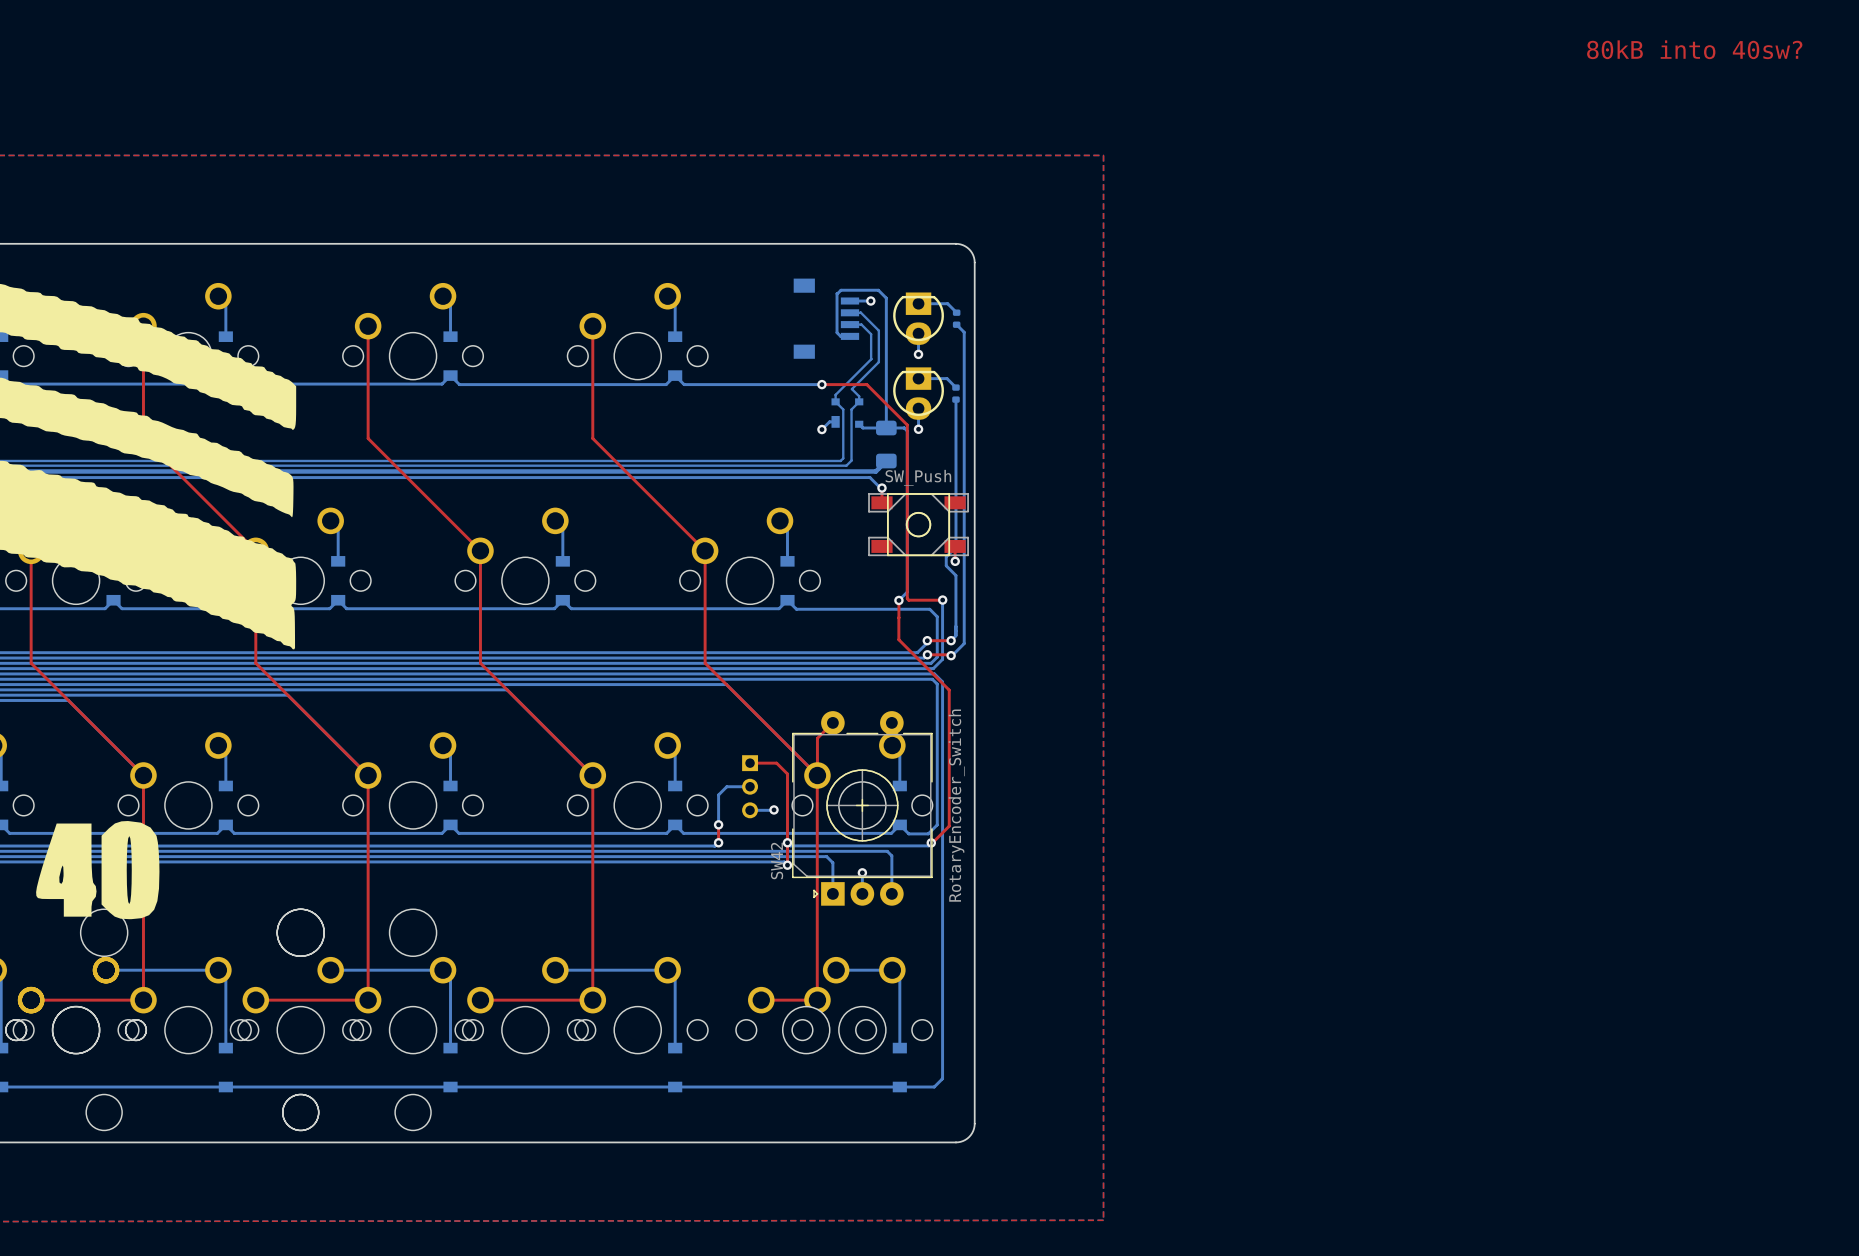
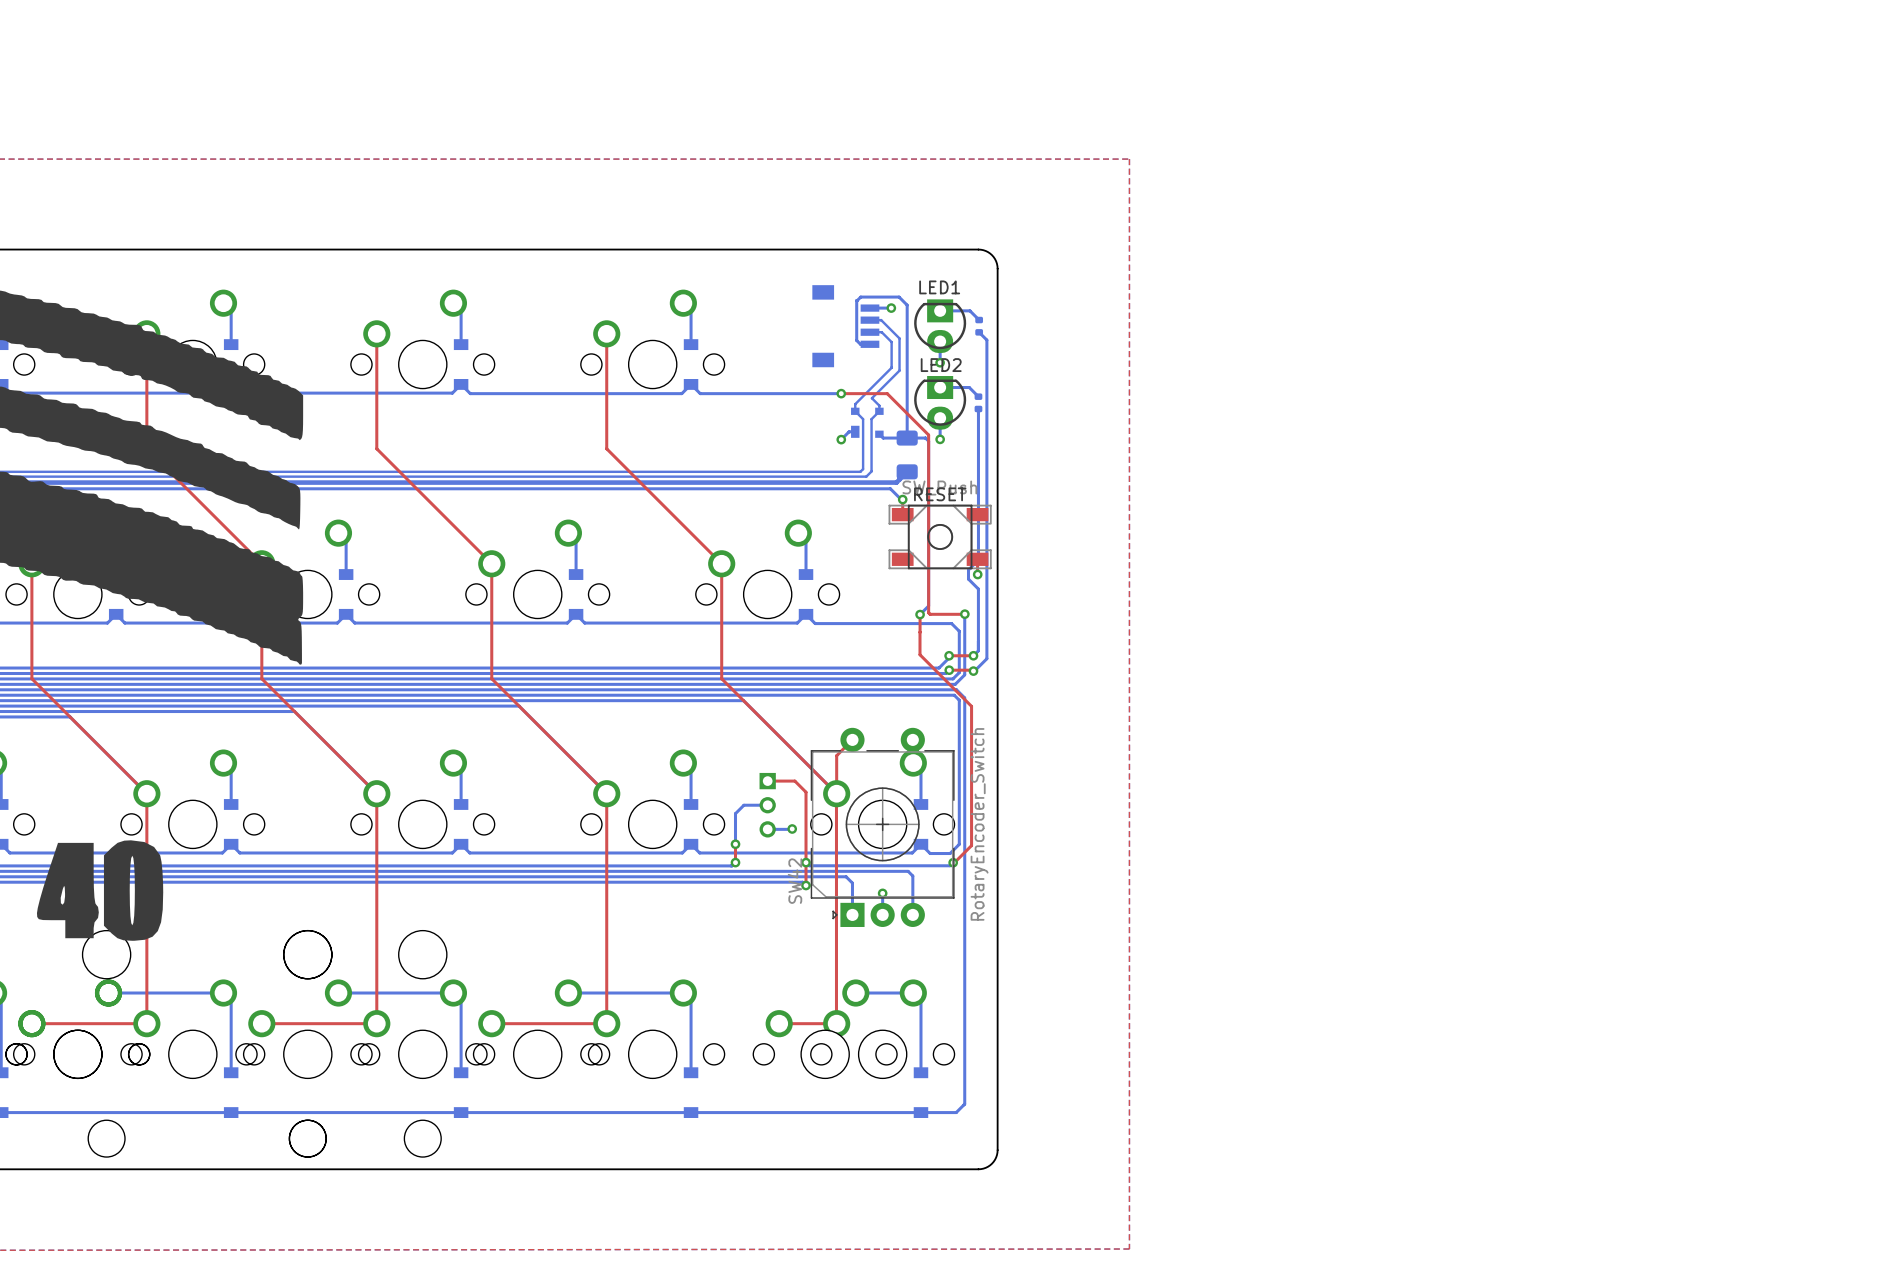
text: 80kB into 40sw? (1694, 49) -> none
text: none -> LED1 (939, 287)
text: none -> LED2 (941, 365)
text: none -> RESET (940, 494)

